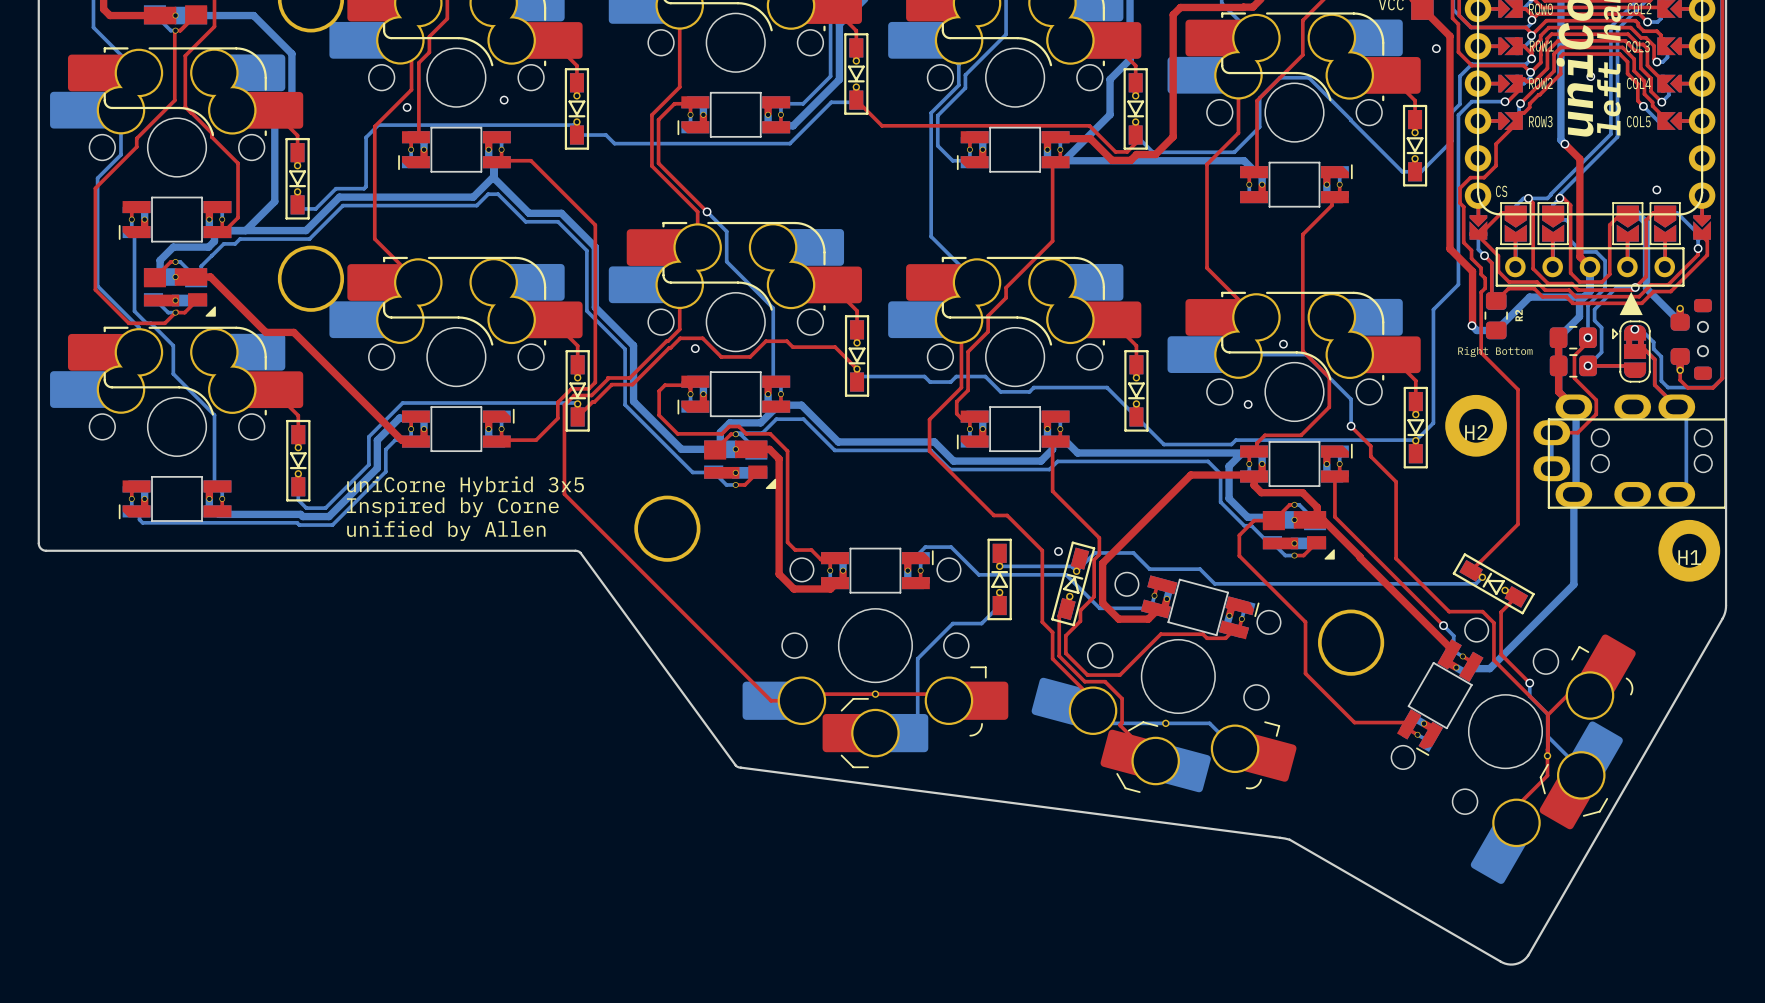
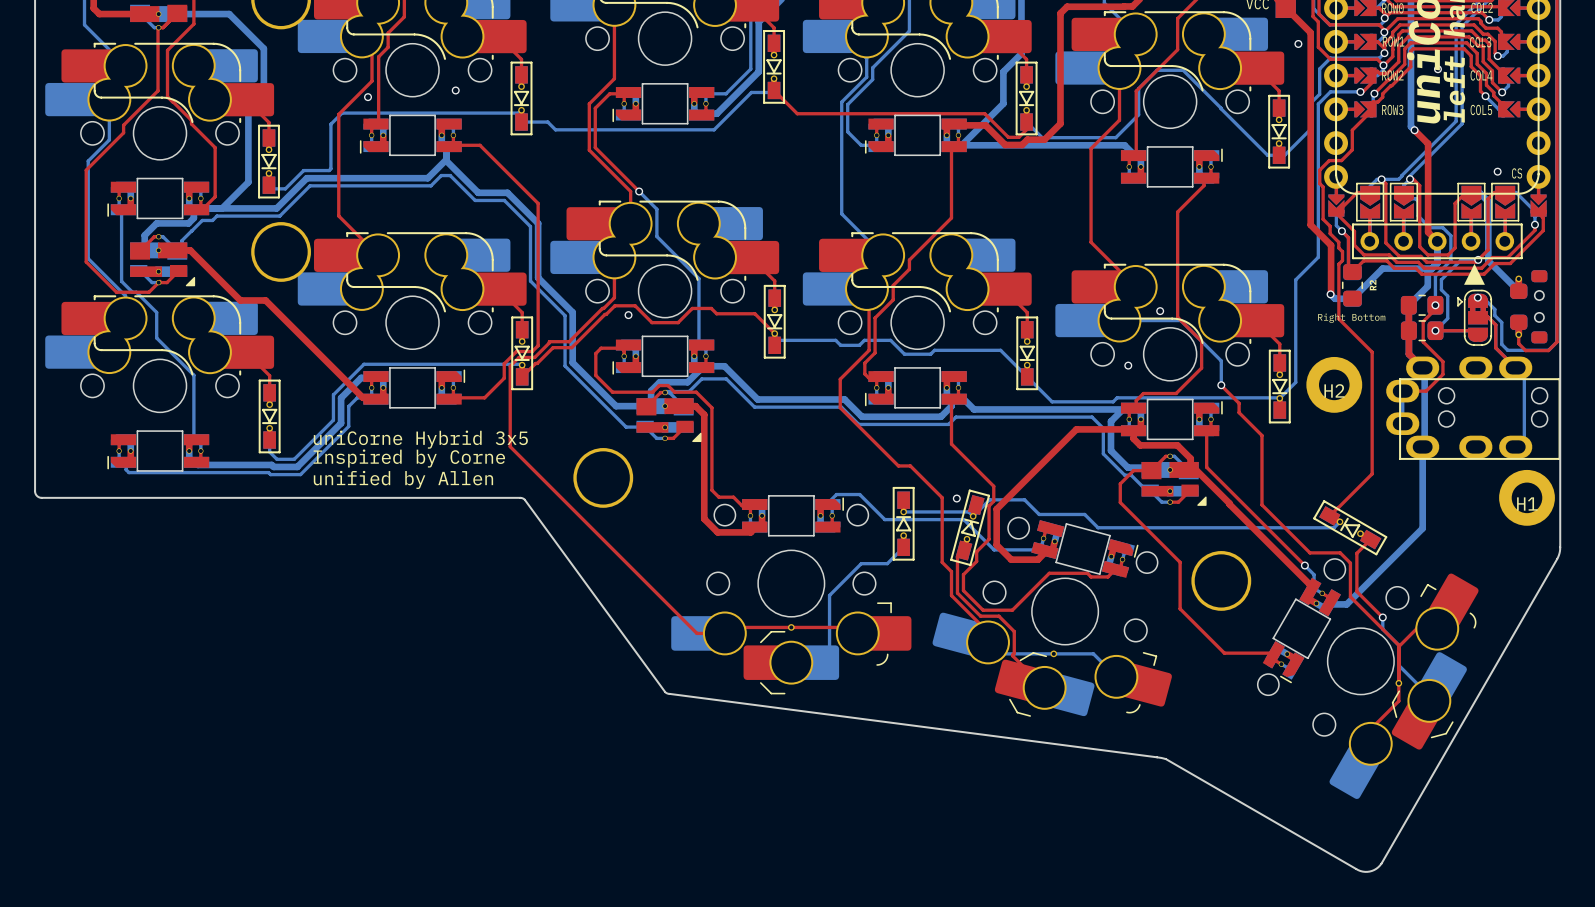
part text position: CS (1501, 191) -> CS (1517, 173)

